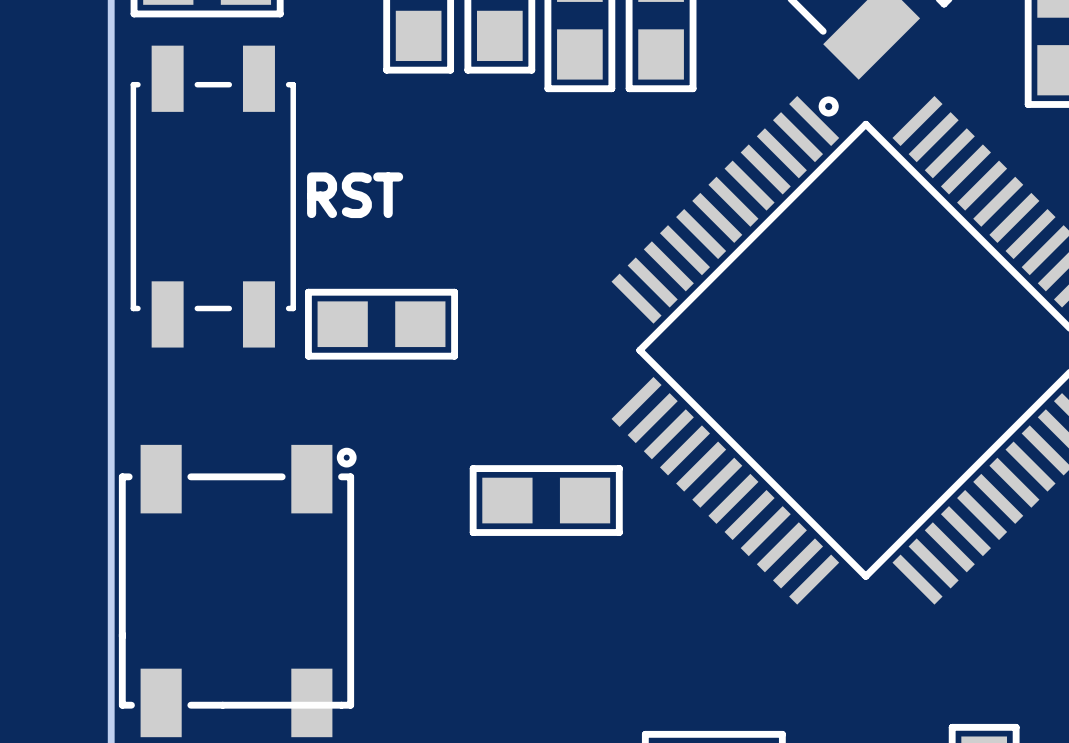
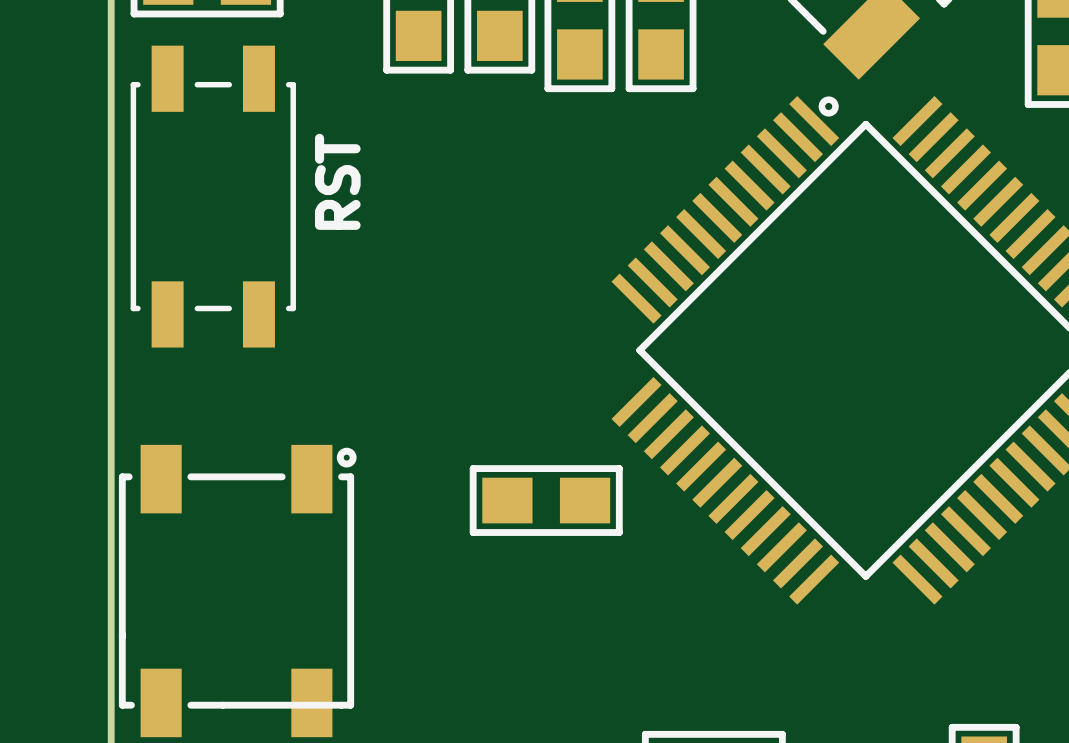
text rotation: 0° (355, 195) -> 90° counterclockwise (337, 181)
part: (381, 324) -> none

